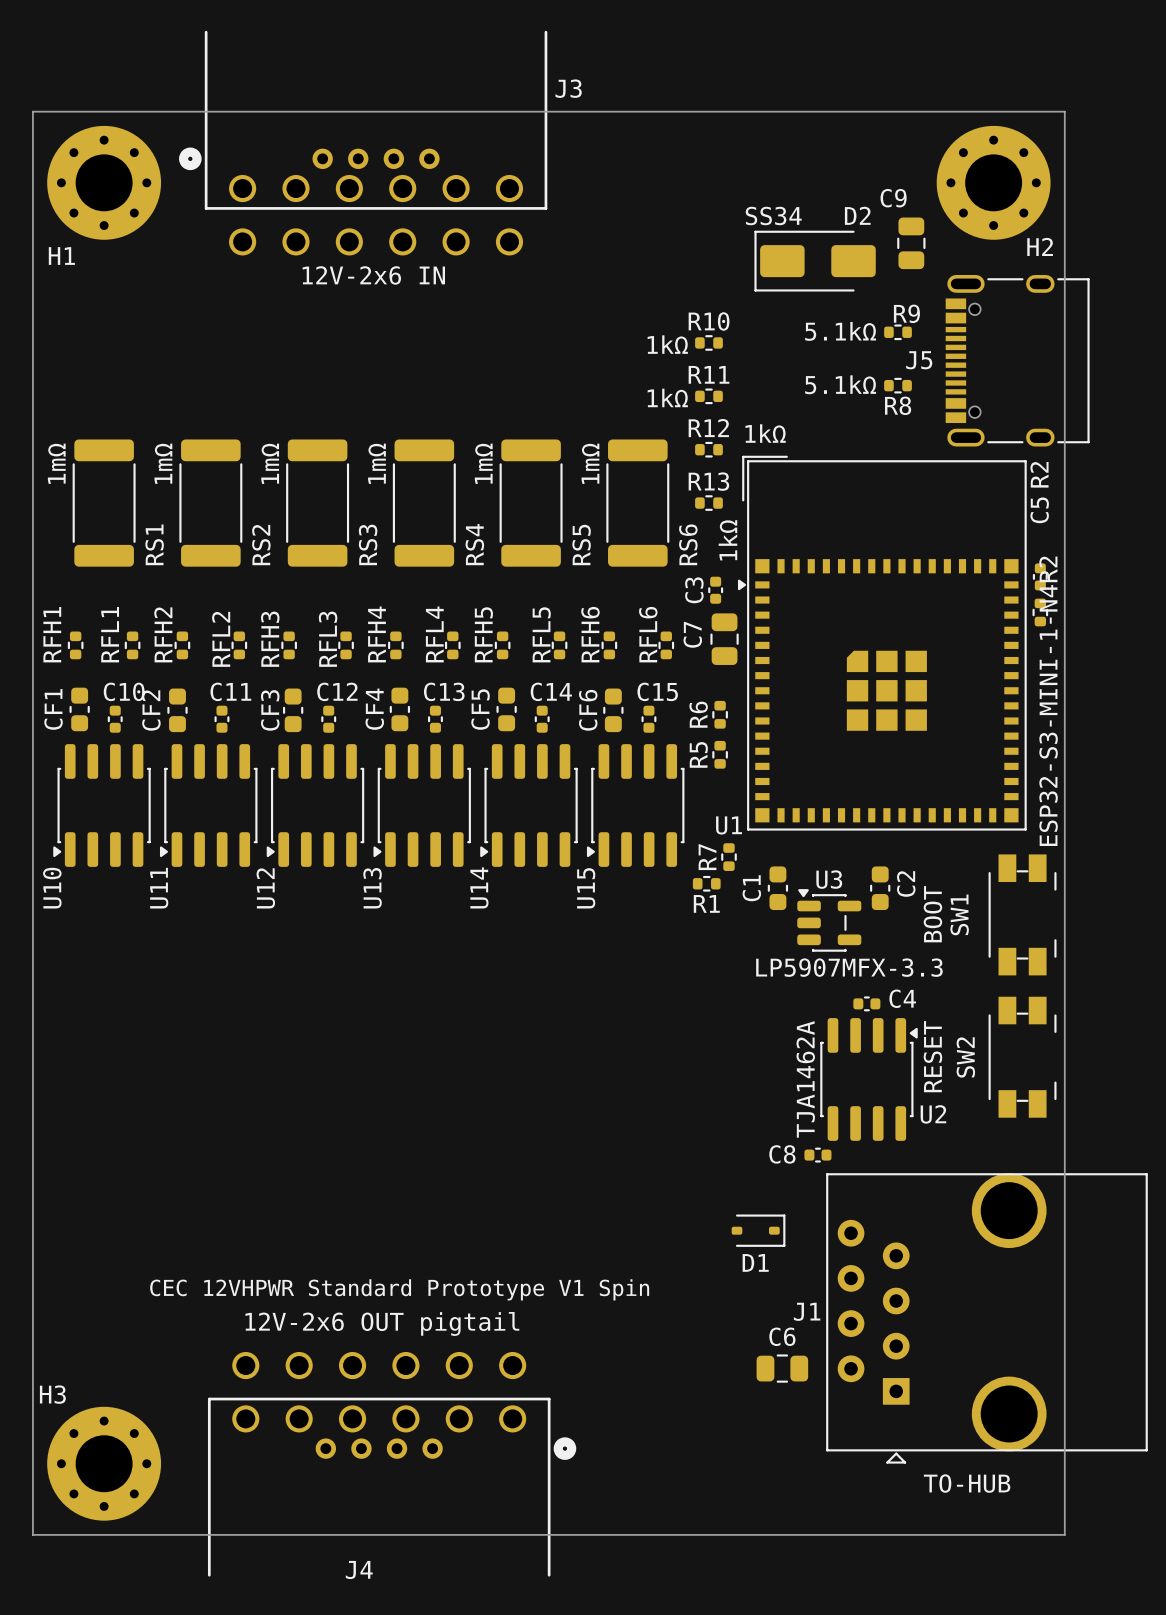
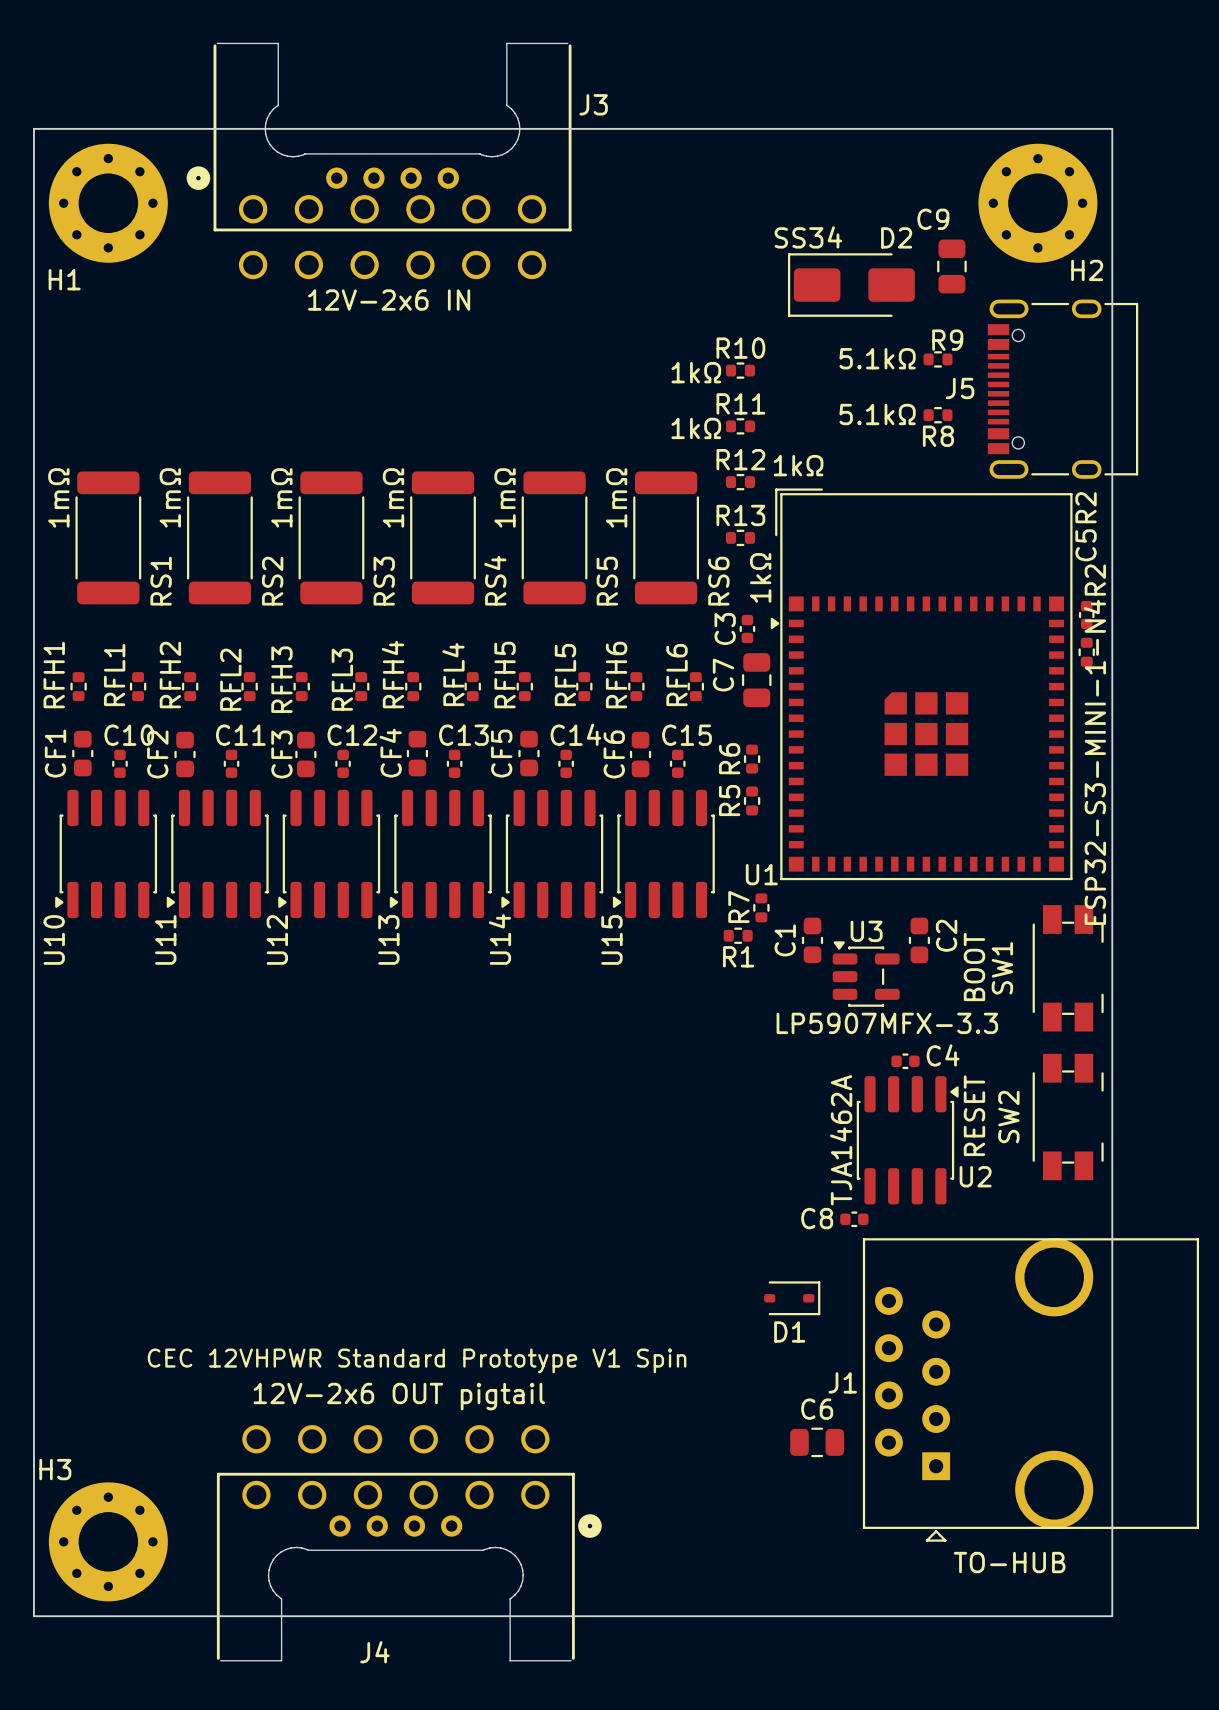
J3 footprint: [179, 30, 548, 256] -> [186, 43, 572, 280]
J4 footprint: [207, 1351, 577, 1577] -> [216, 1425, 602, 1661]

